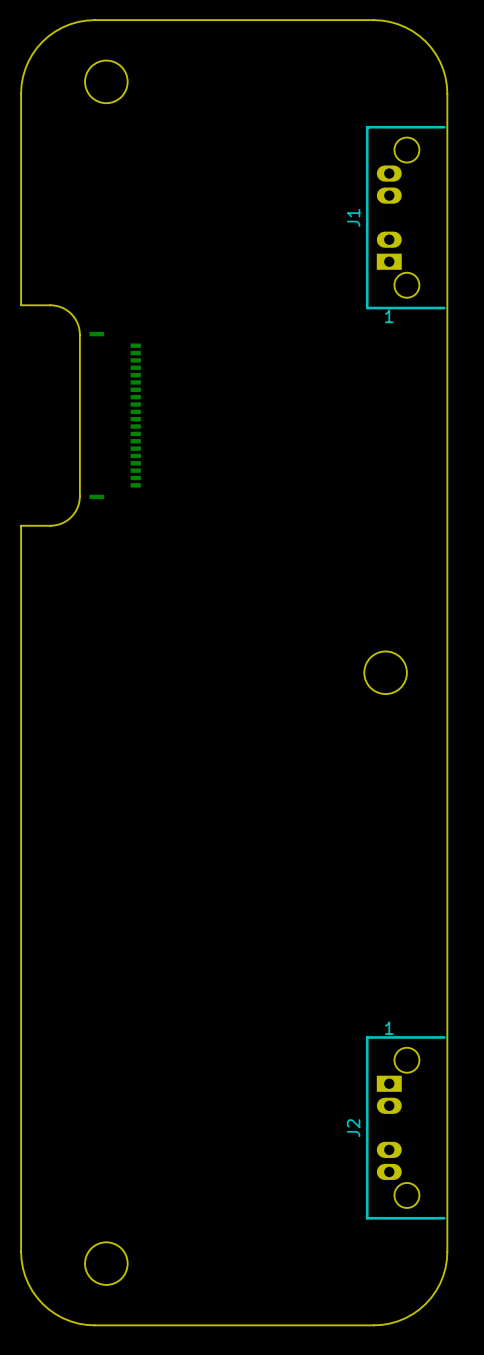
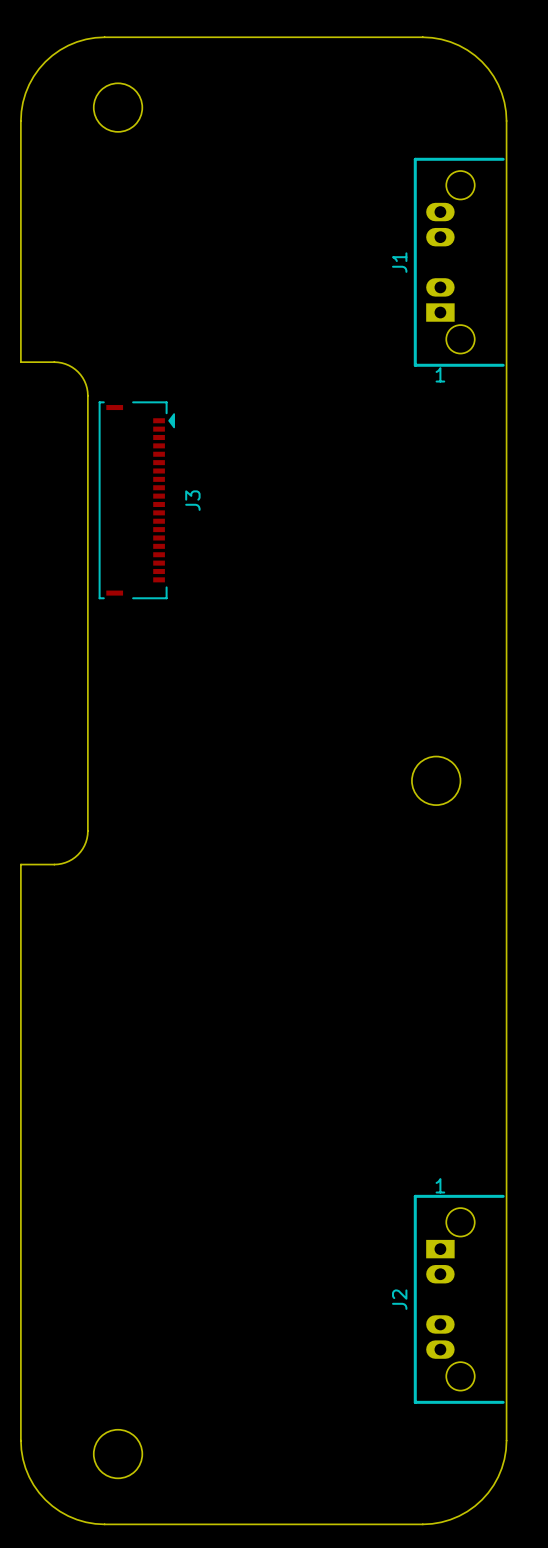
part: (115, 415) -> none
J3: none -> (136, 500)
board edge: (79, 496) (75, 512) (63, 522) (53, 525) (21, 525) (21, 746) -> (87, 579) (87, 838) (78, 854) (65, 862) (20, 864)

